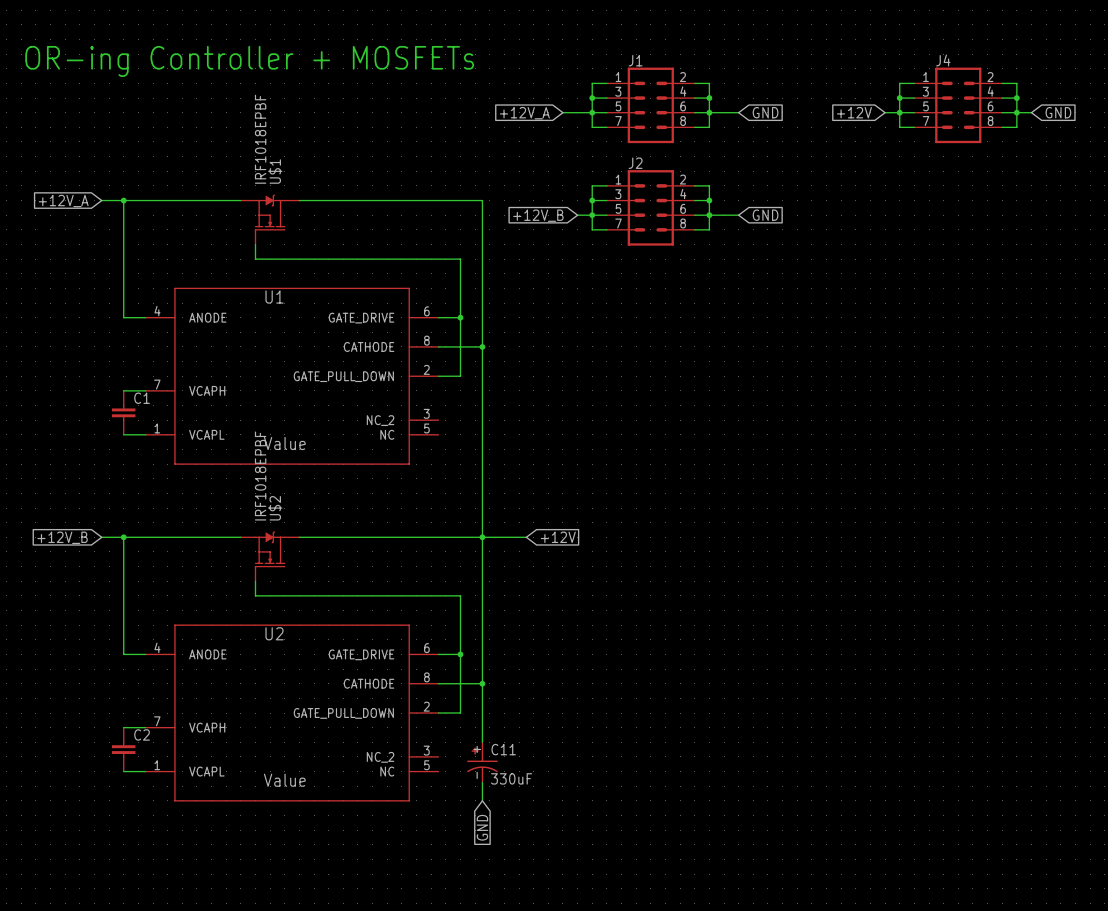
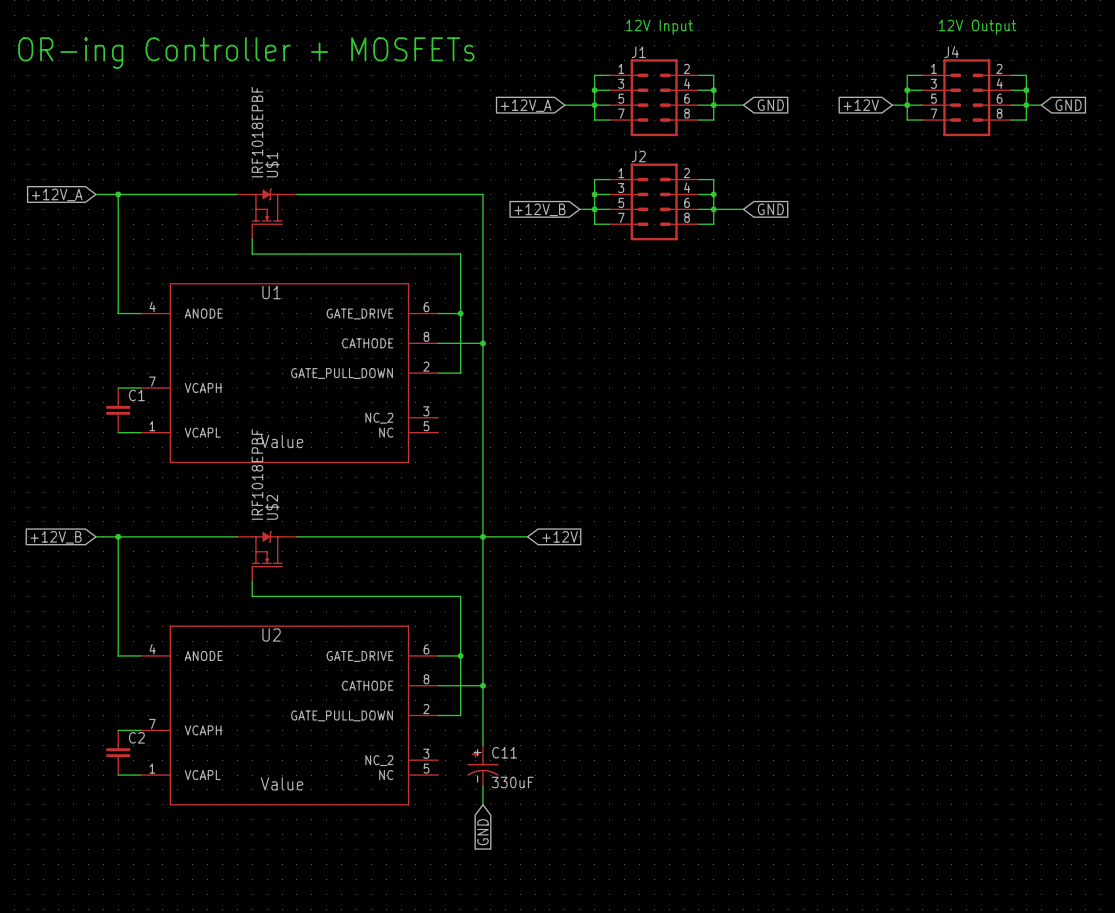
text: none -> 12V Input (659, 27)
text: none -> 12V Output (977, 27)

